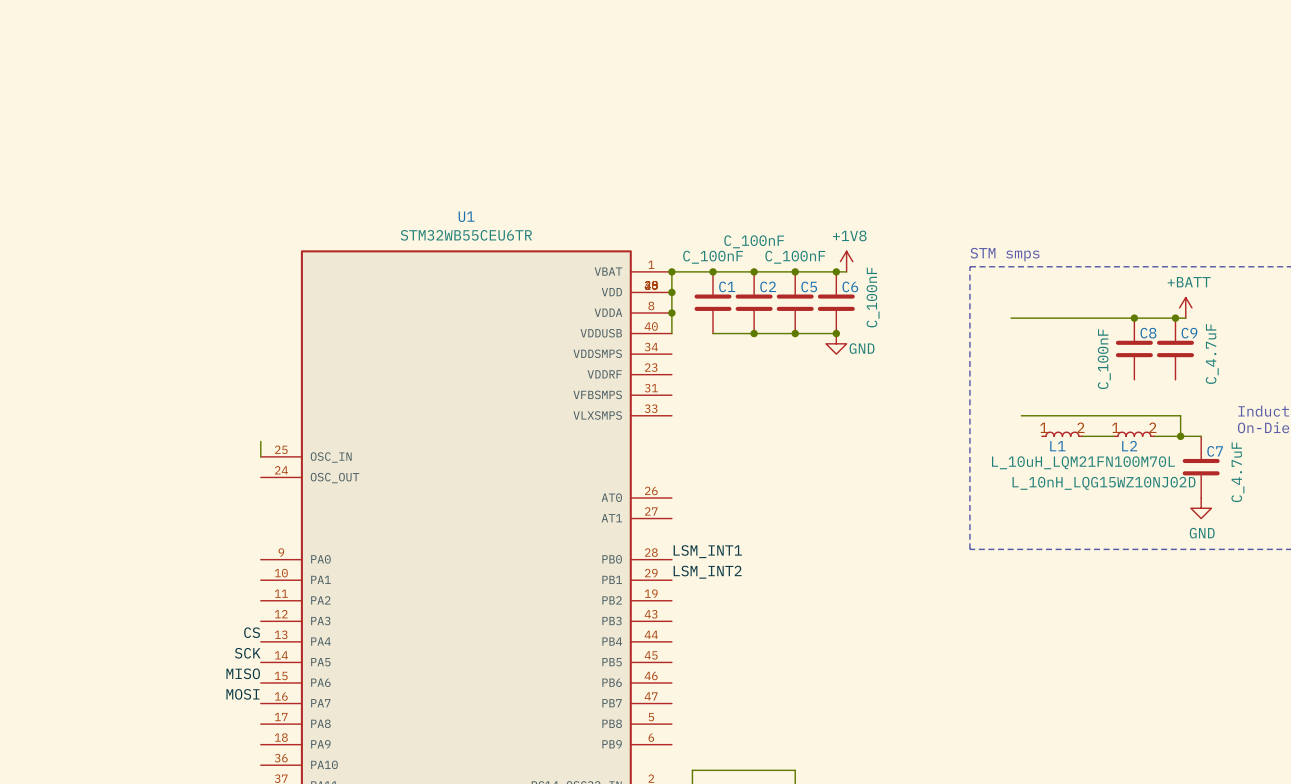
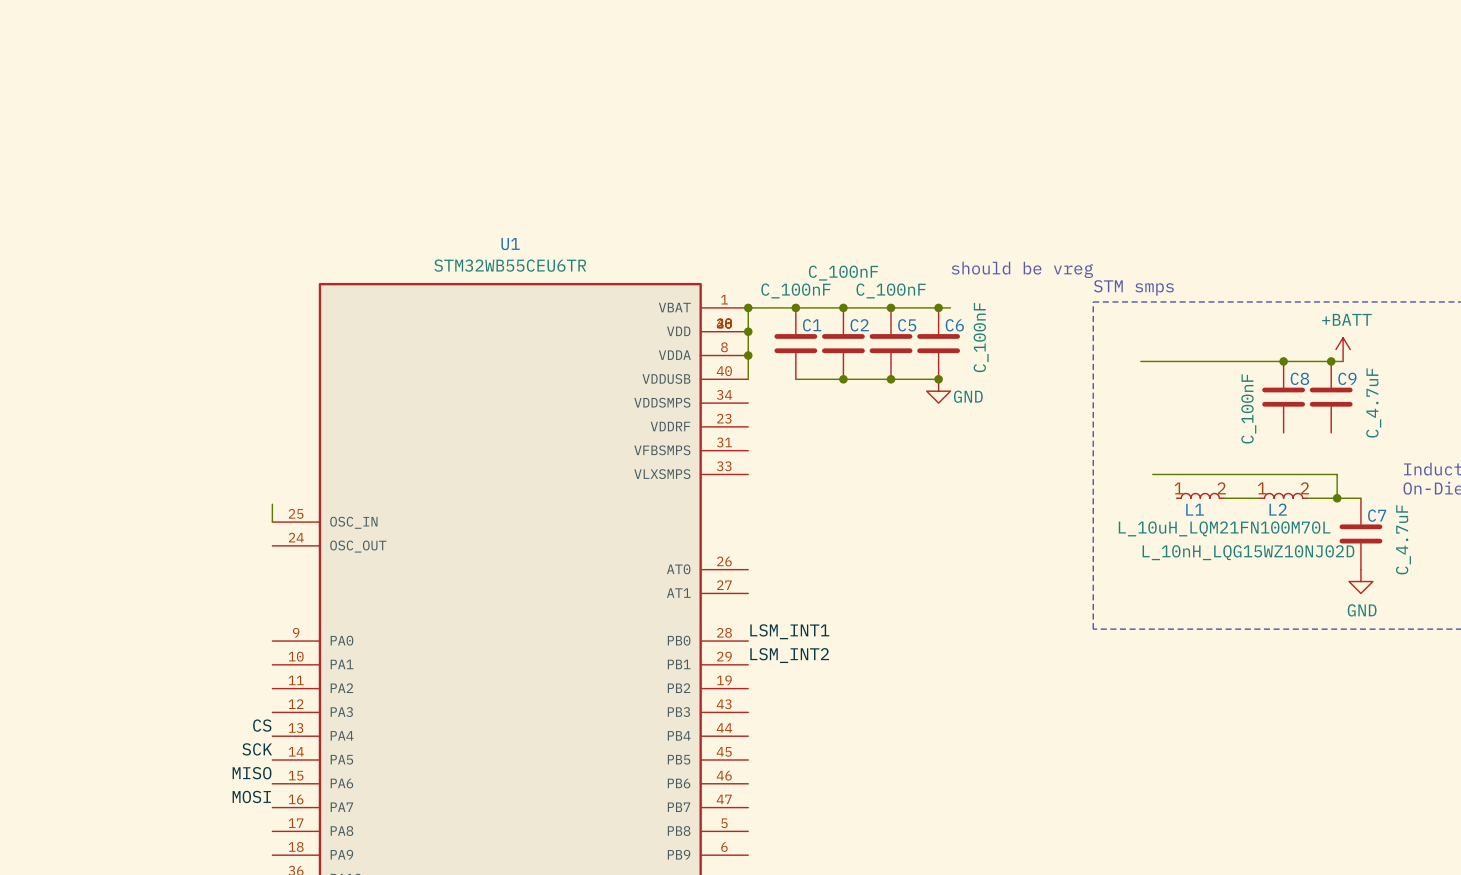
text: none -> should be vreg (1022, 269)
power symbol: +1V8 (846, 261) -> none

